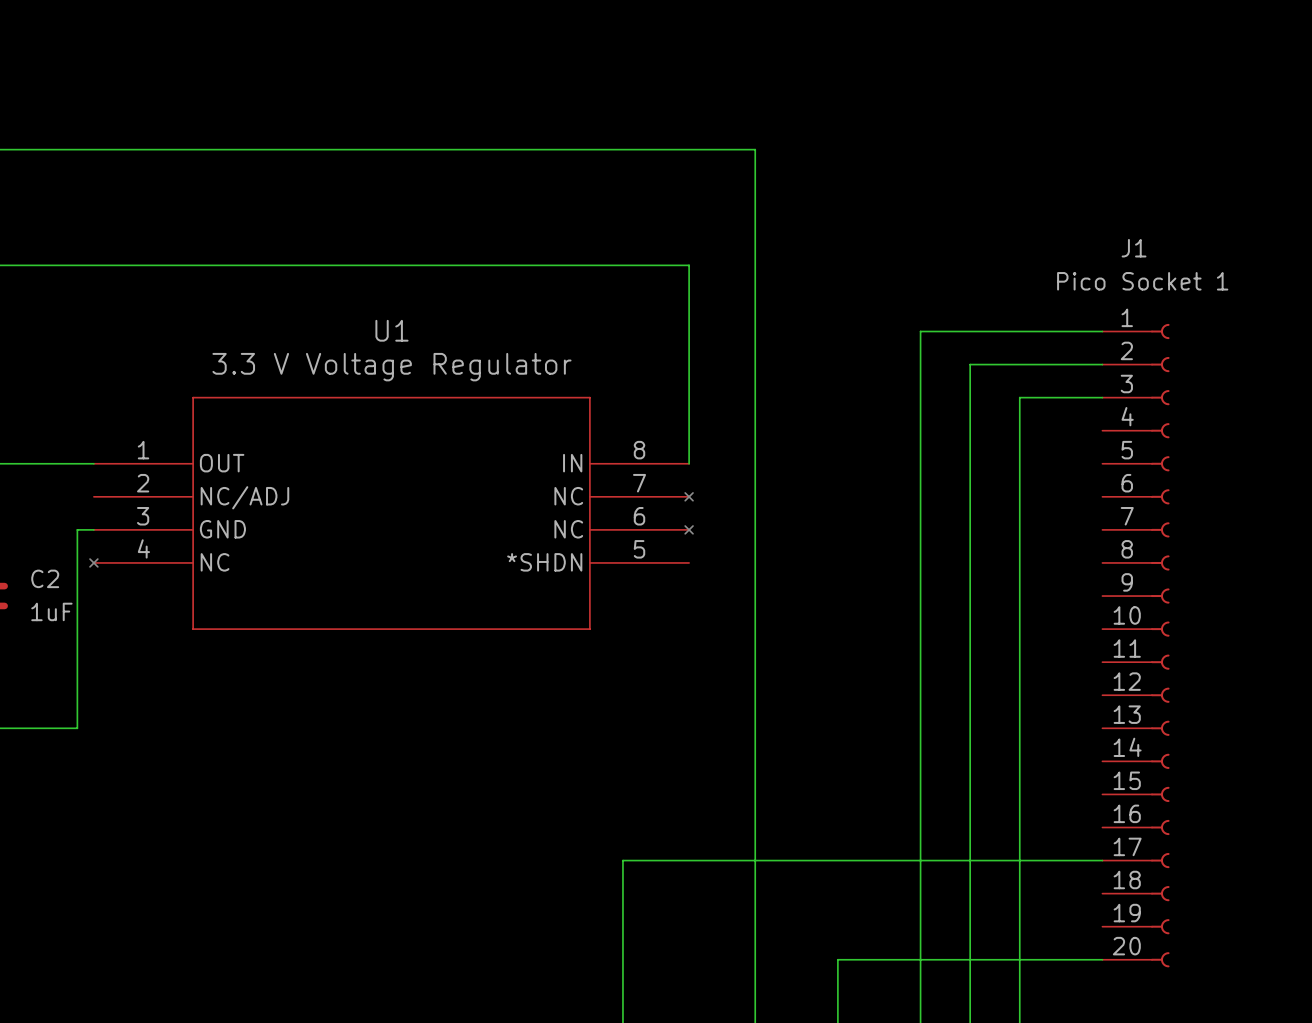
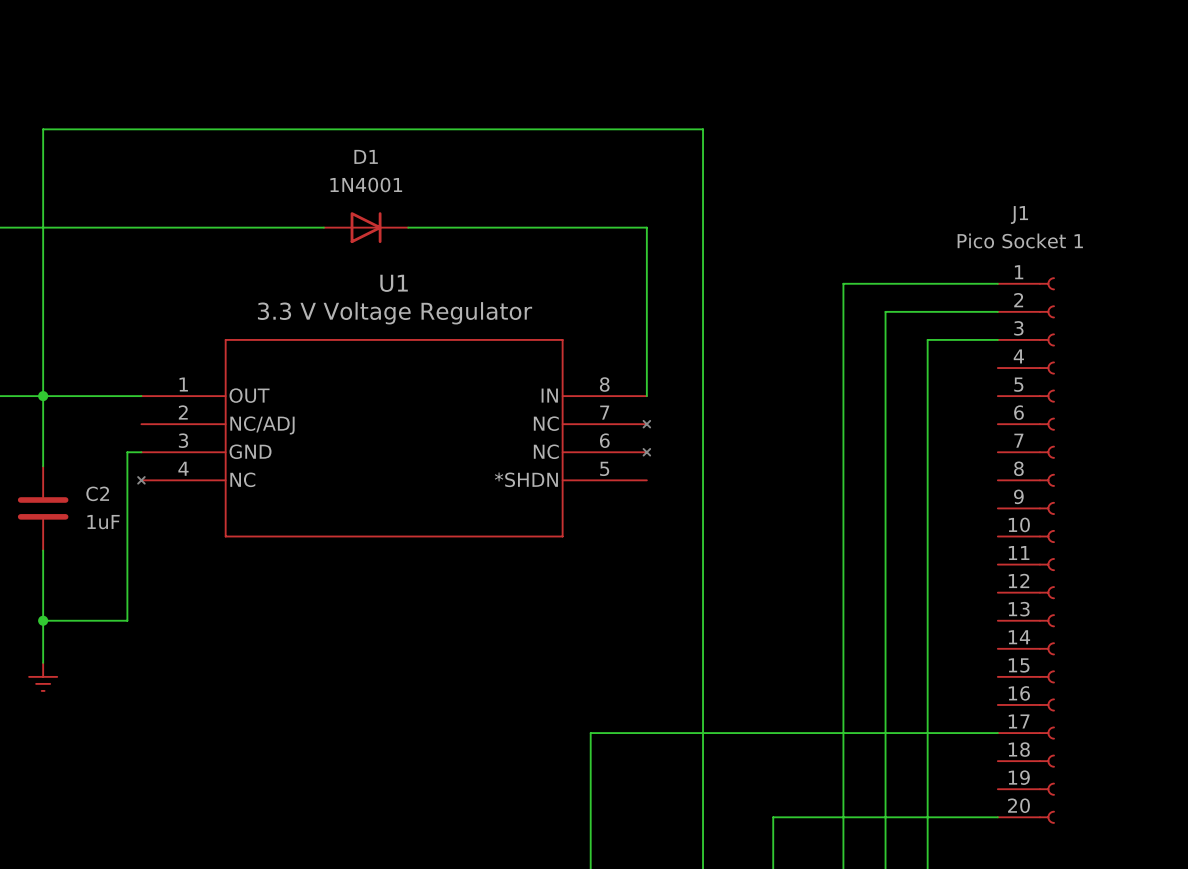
D1: none -> 1N4001 (366, 227)

